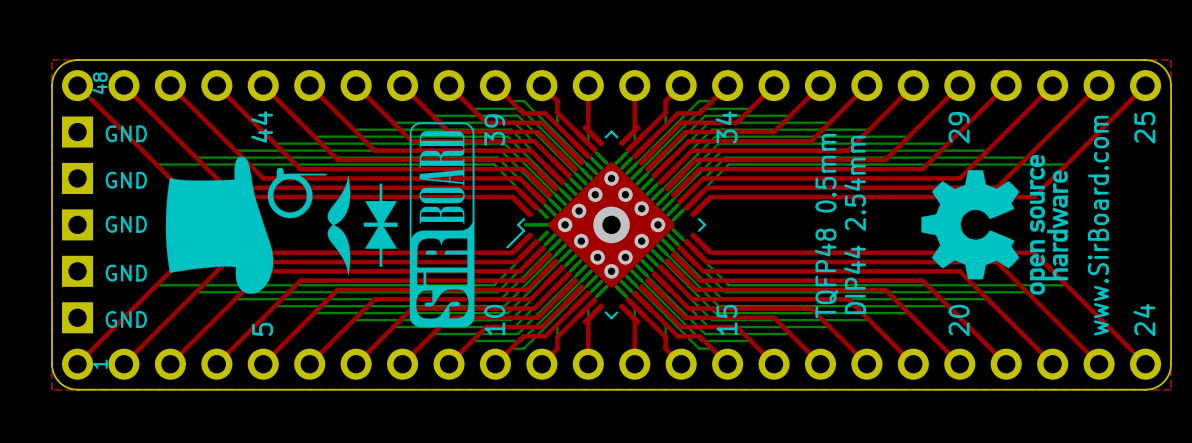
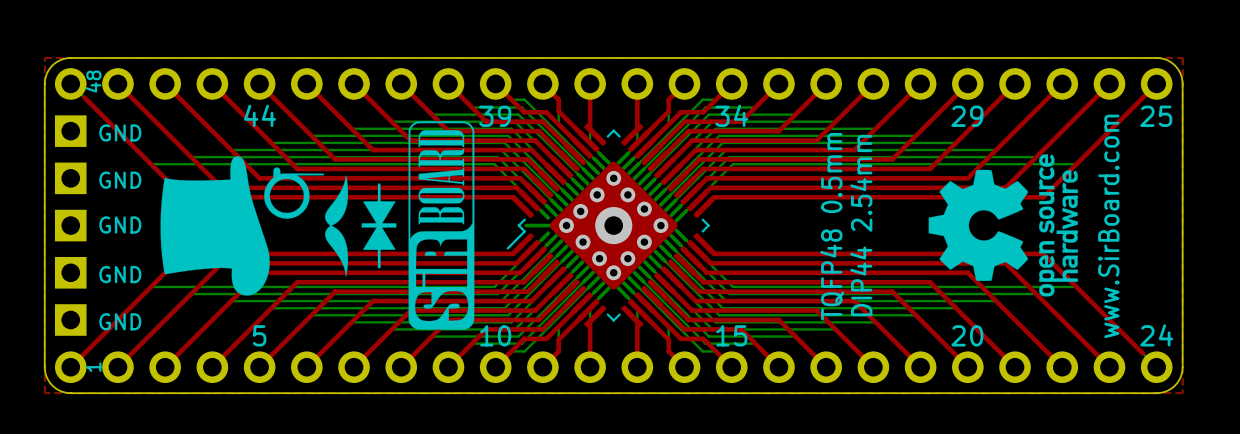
text rotation: 0° (262, 126) -> 90° clockwise (260, 115)
text rotation: 0° (726, 127) -> 90° clockwise (731, 115)
text rotation: 0° (959, 127) -> 90° clockwise (967, 116)
text rotation: 0° (1144, 127) -> 90° clockwise (1156, 116)
text rotation: 0° (494, 130) -> 90° clockwise (495, 116)
text rotation: 0° (494, 320) -> 90° clockwise (495, 335)
text rotation: 0° (726, 320) -> 90° clockwise (731, 335)
text rotation: 0° (959, 320) -> 90° clockwise (967, 335)
text rotation: 0° (1144, 320) -> 90° clockwise (1156, 335)
text rotation: 0° (262, 329) -> 90° clockwise (259, 335)

